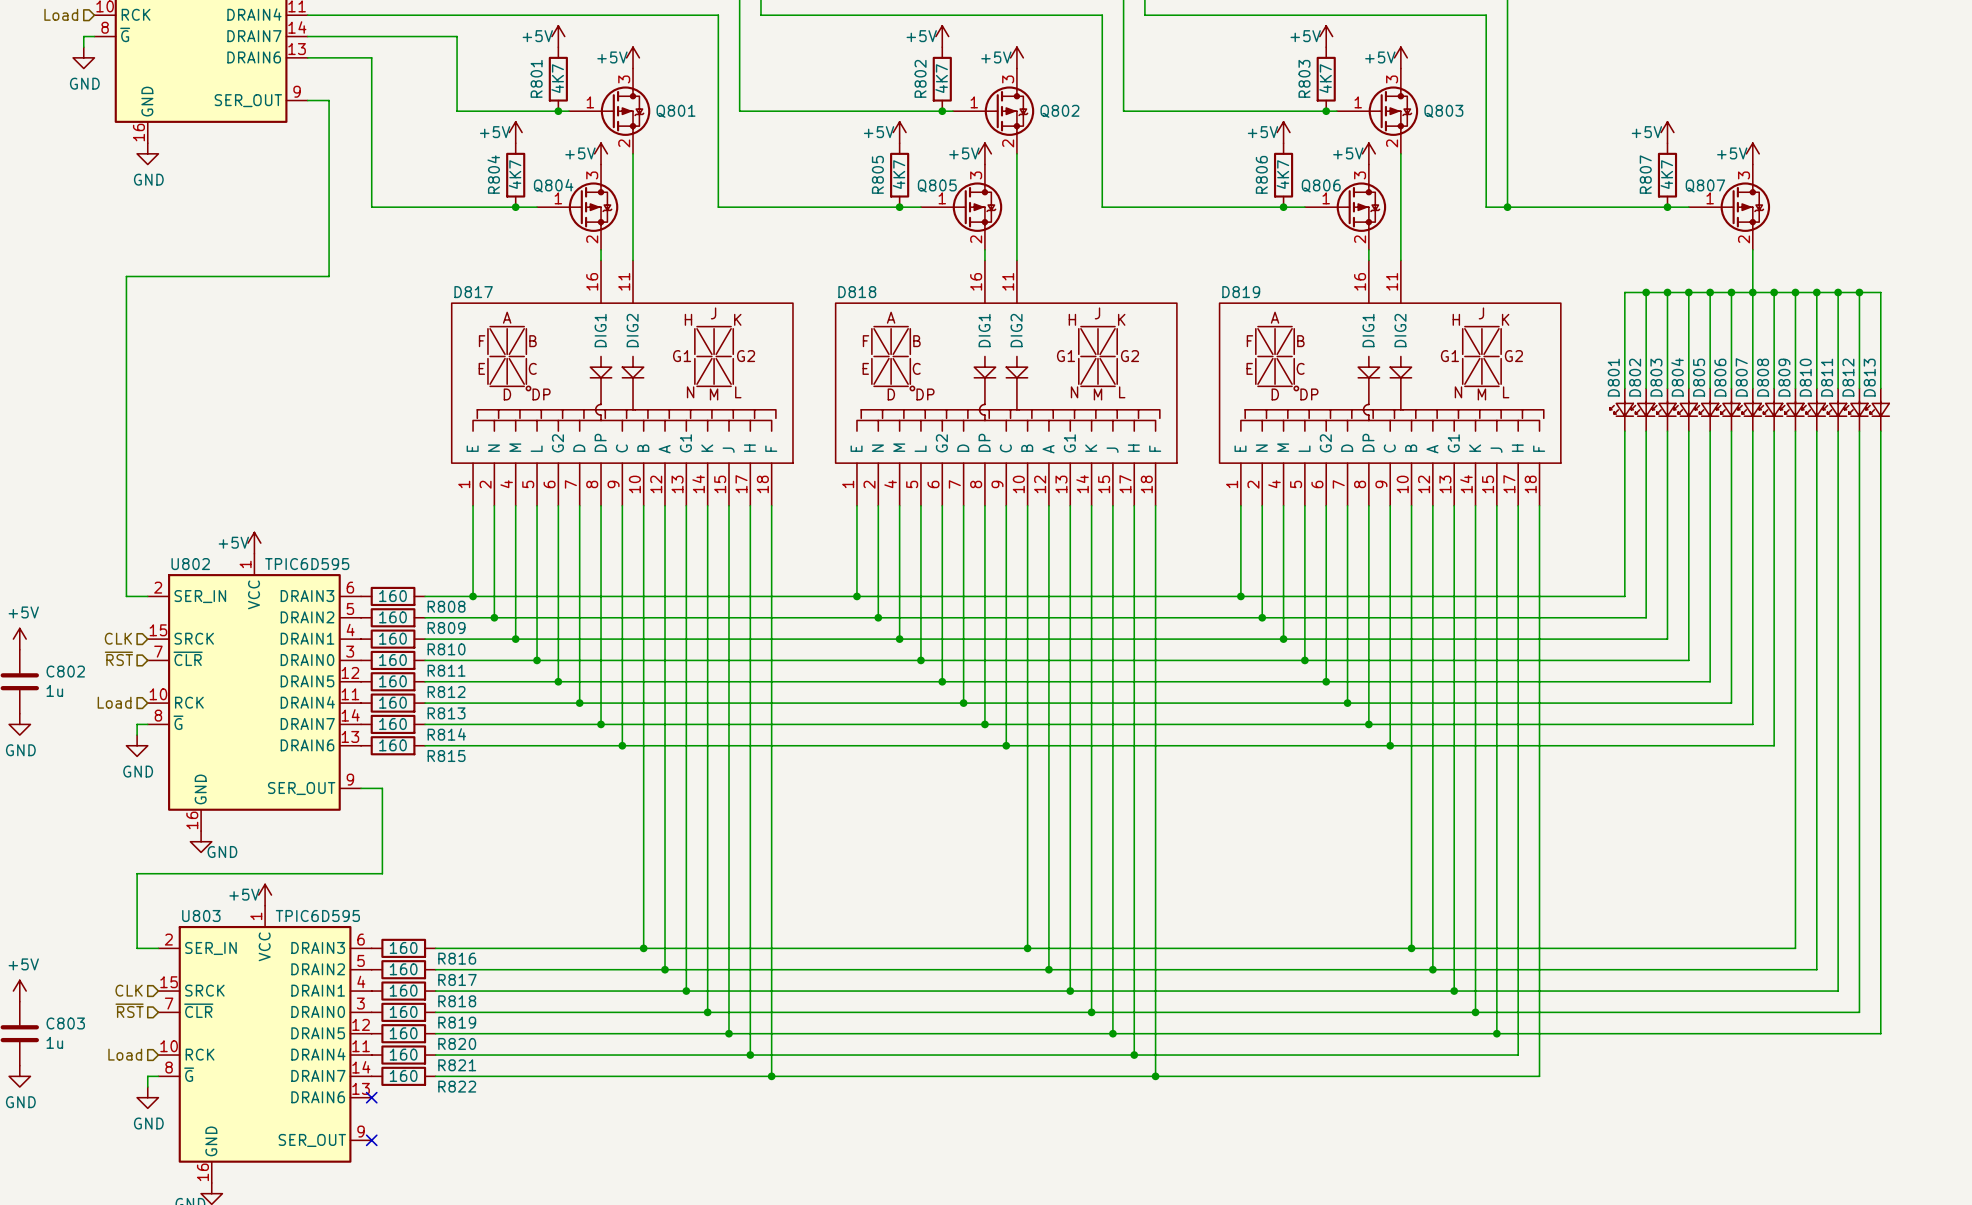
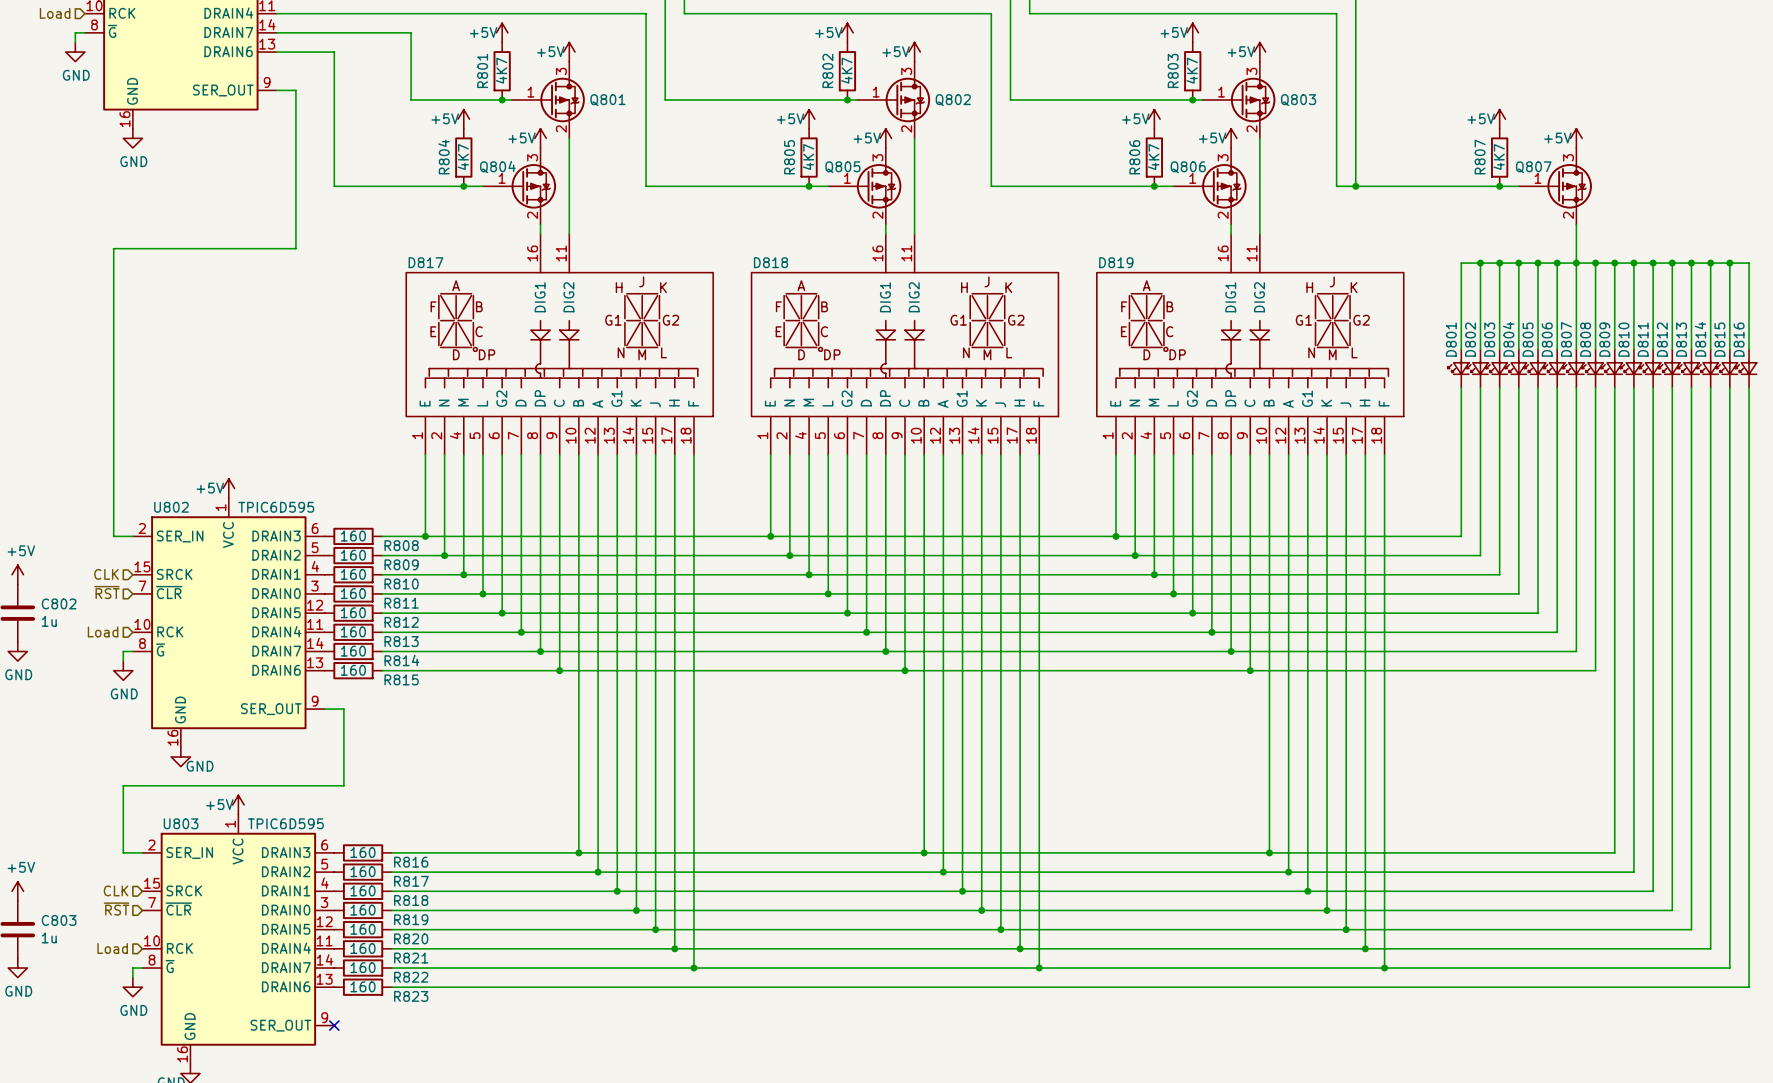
wire: none -> (1691, 263) (1749, 263) (1749, 349)
junction: none -> (1691, 263)
wire: none -> (1710, 263) (1710, 349)
junction: none -> (1710, 263)
wire: none -> (1729, 263) (1729, 349)
junction: none -> (1729, 263)
D814: none -> (1707, 368)
D815: none -> (1726, 368)
D816: none -> (1746, 368)
wire: none -> (1710, 387) (1710, 948) (1365, 948)
wire: none -> (1729, 387) (1729, 968) (1384, 968)
wire: none -> (1749, 387) (1749, 987) (391, 987)
junction: none -> (1365, 948)
junction: none -> (1384, 968)
no-connect mark: (371, 1097) -> none
R823: none -> 160 (363, 987)

